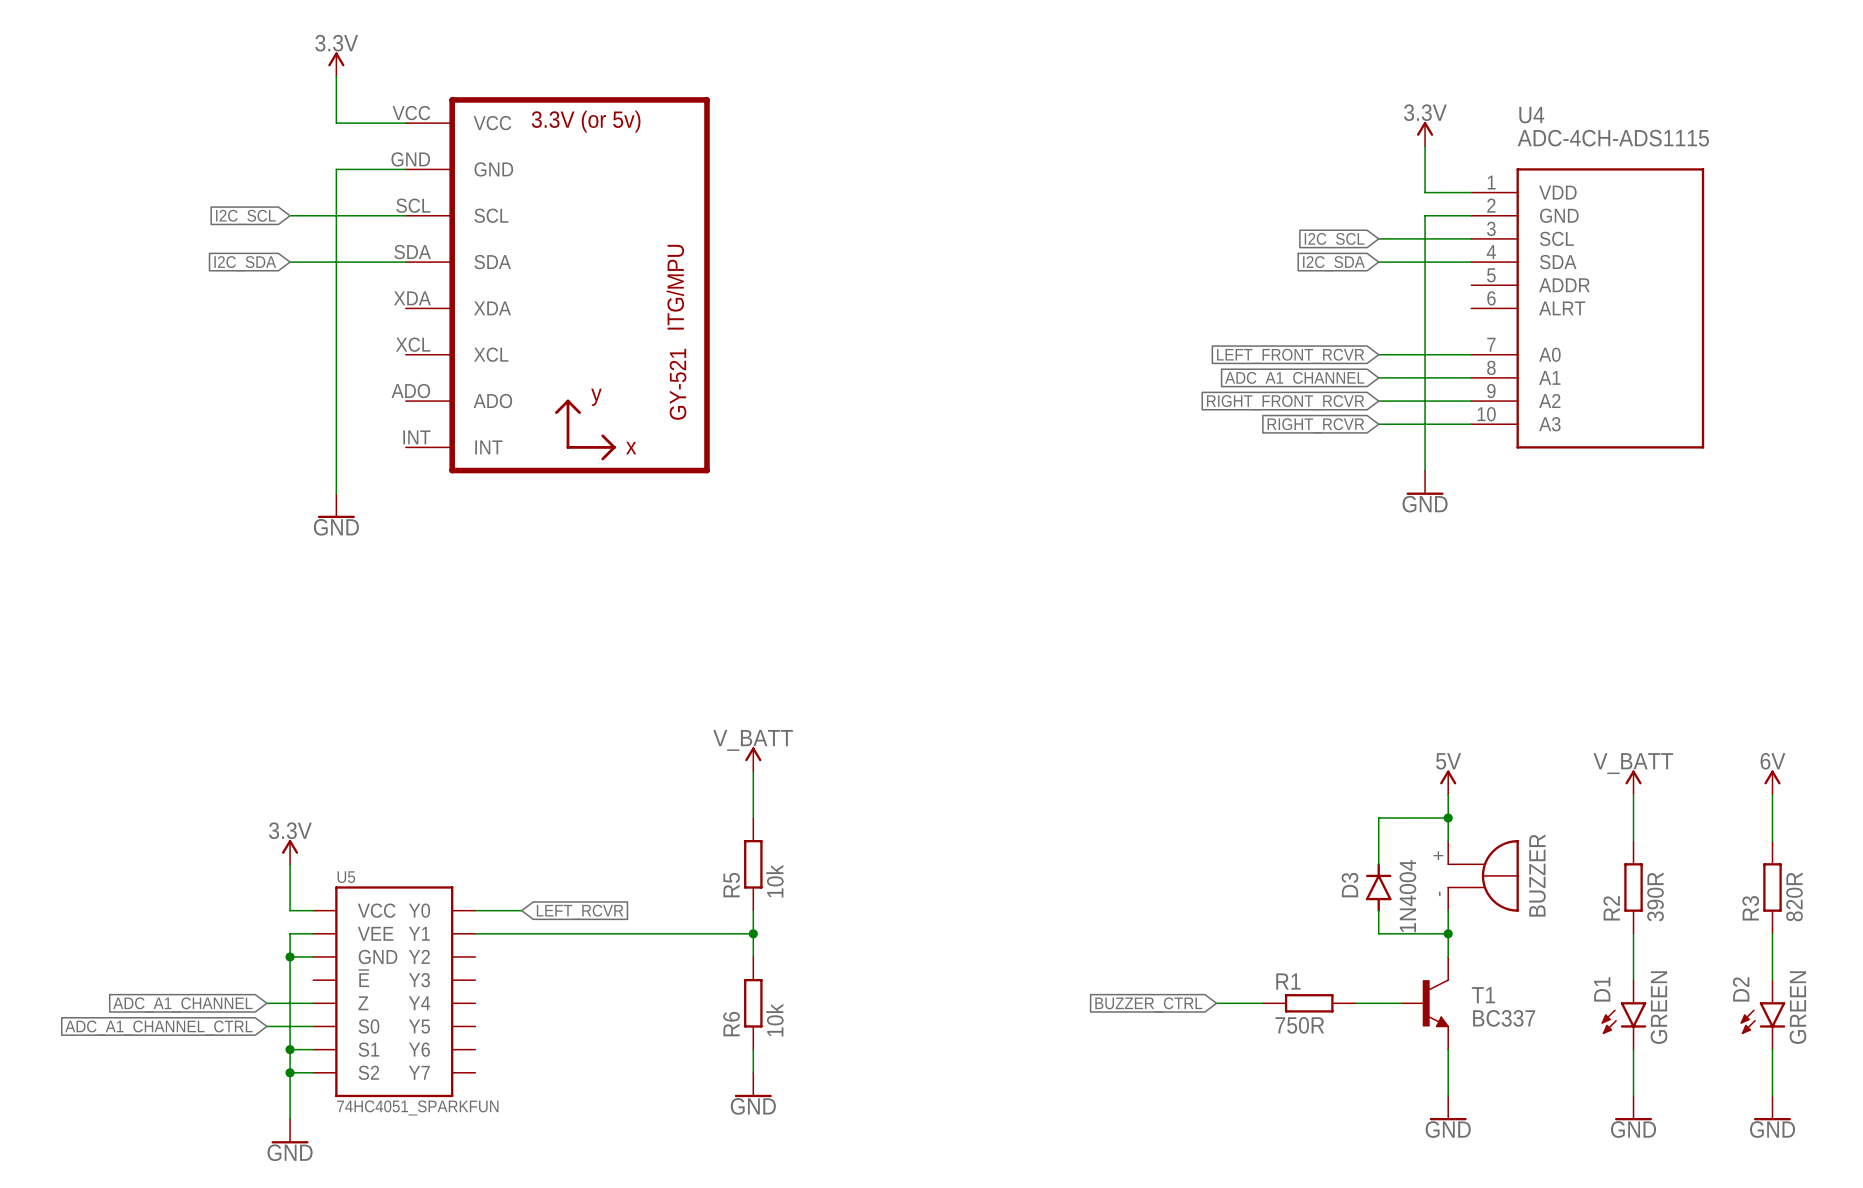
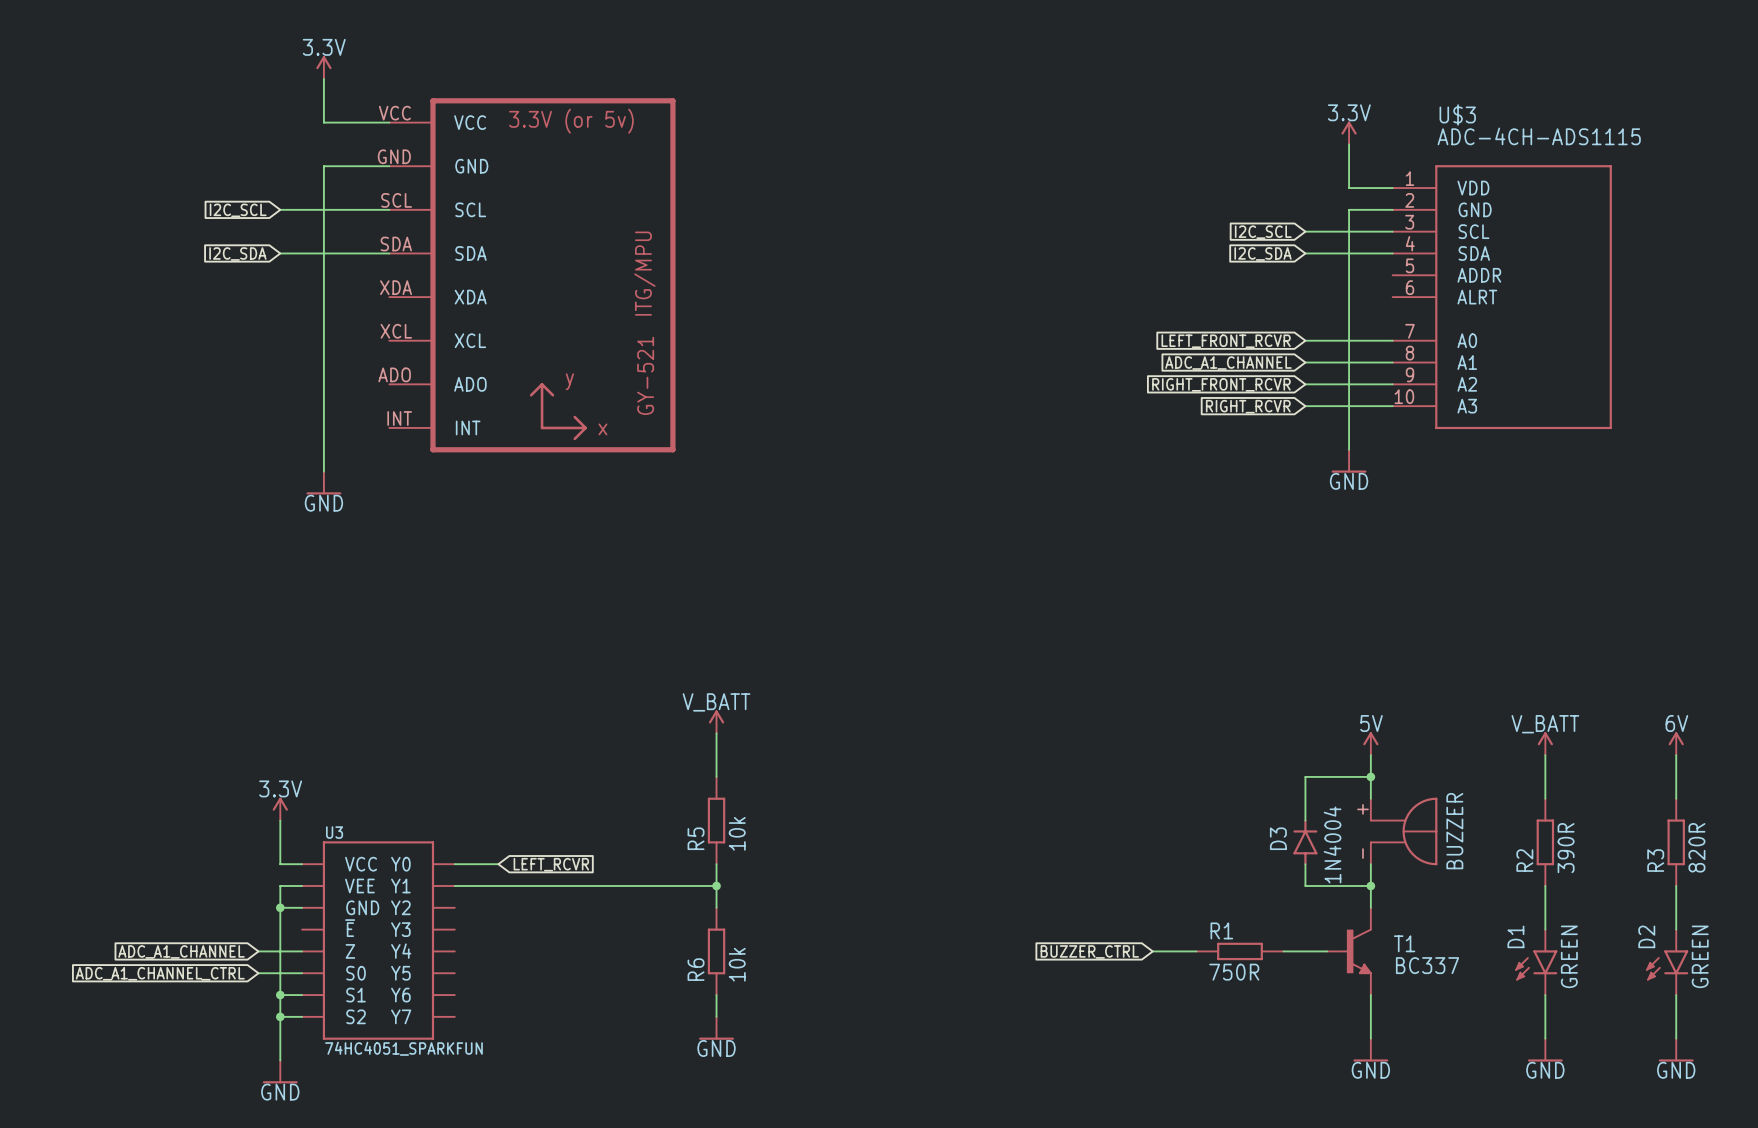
U4 name: U4 (1531, 115) -> U$3 (1457, 114)
U5 name: U5 (346, 877) -> U3 (334, 832)

